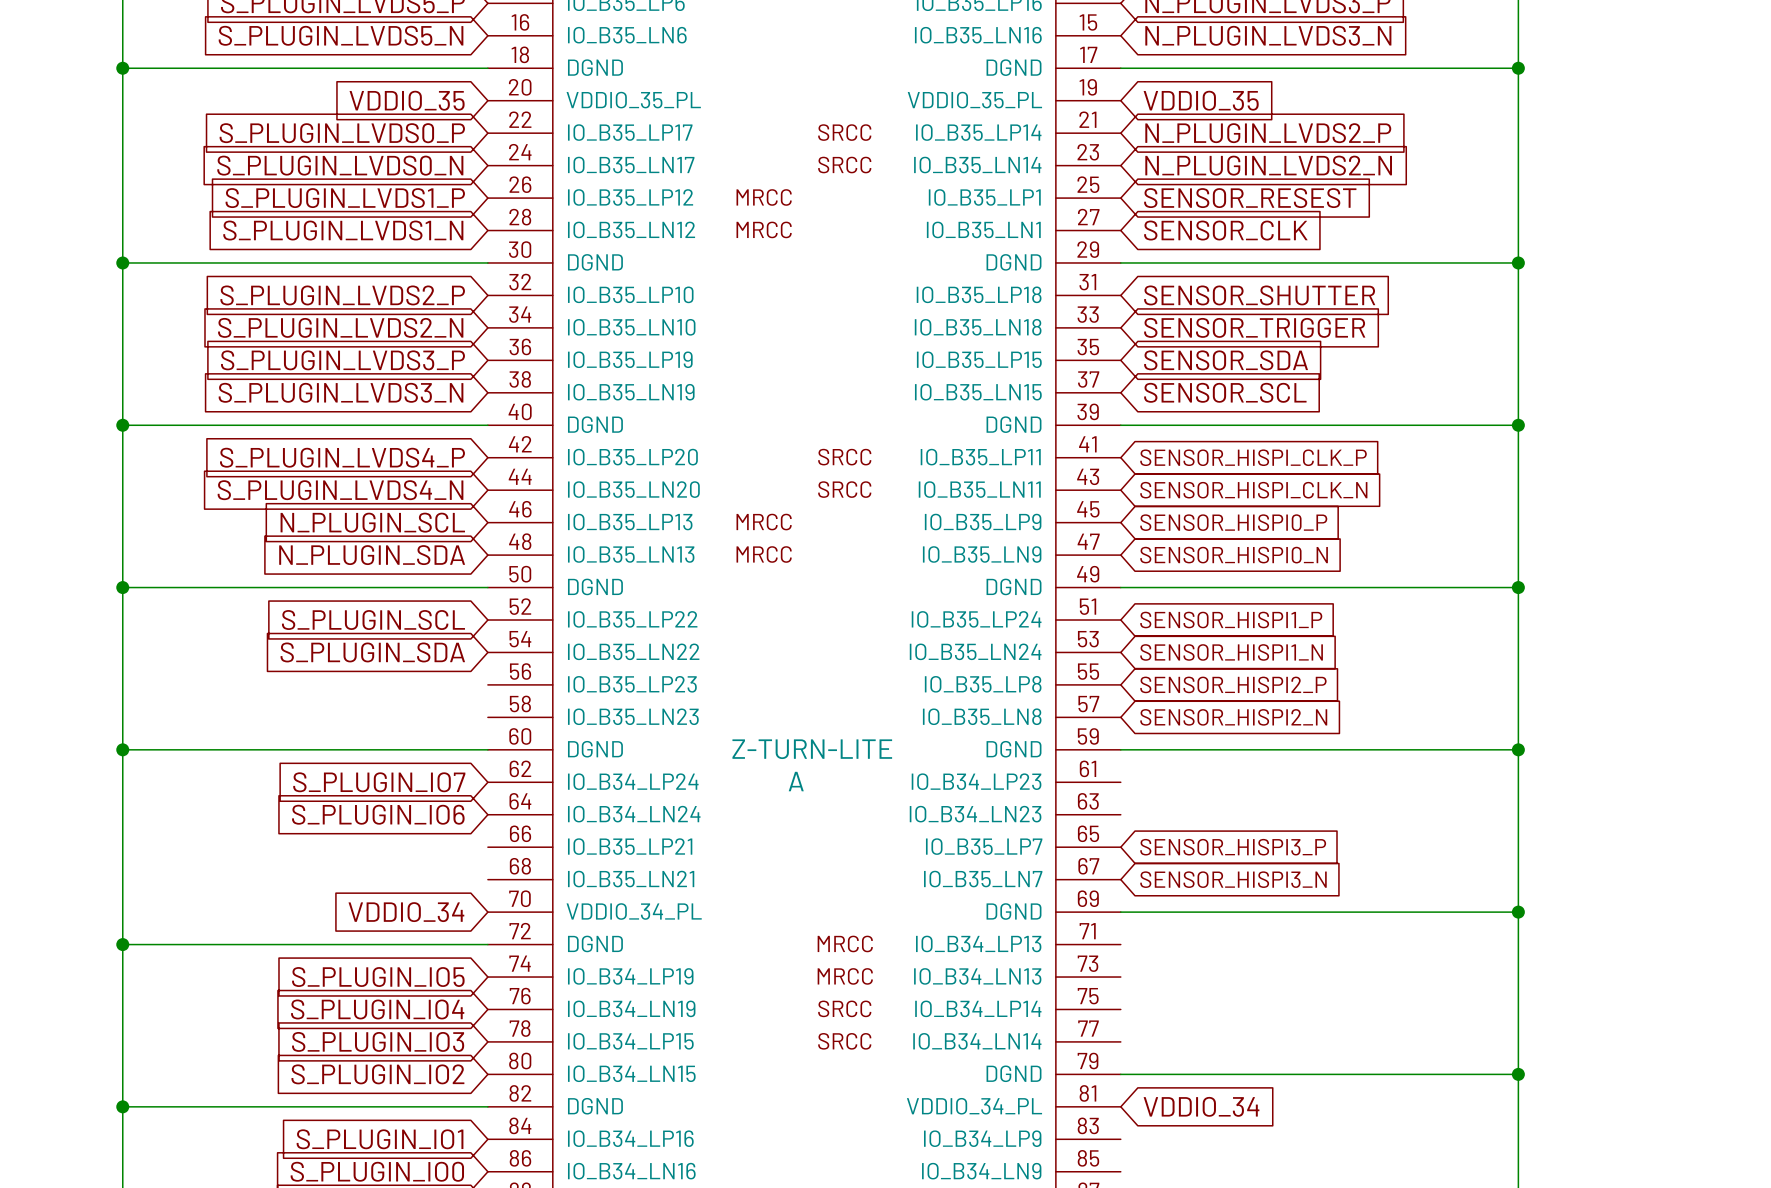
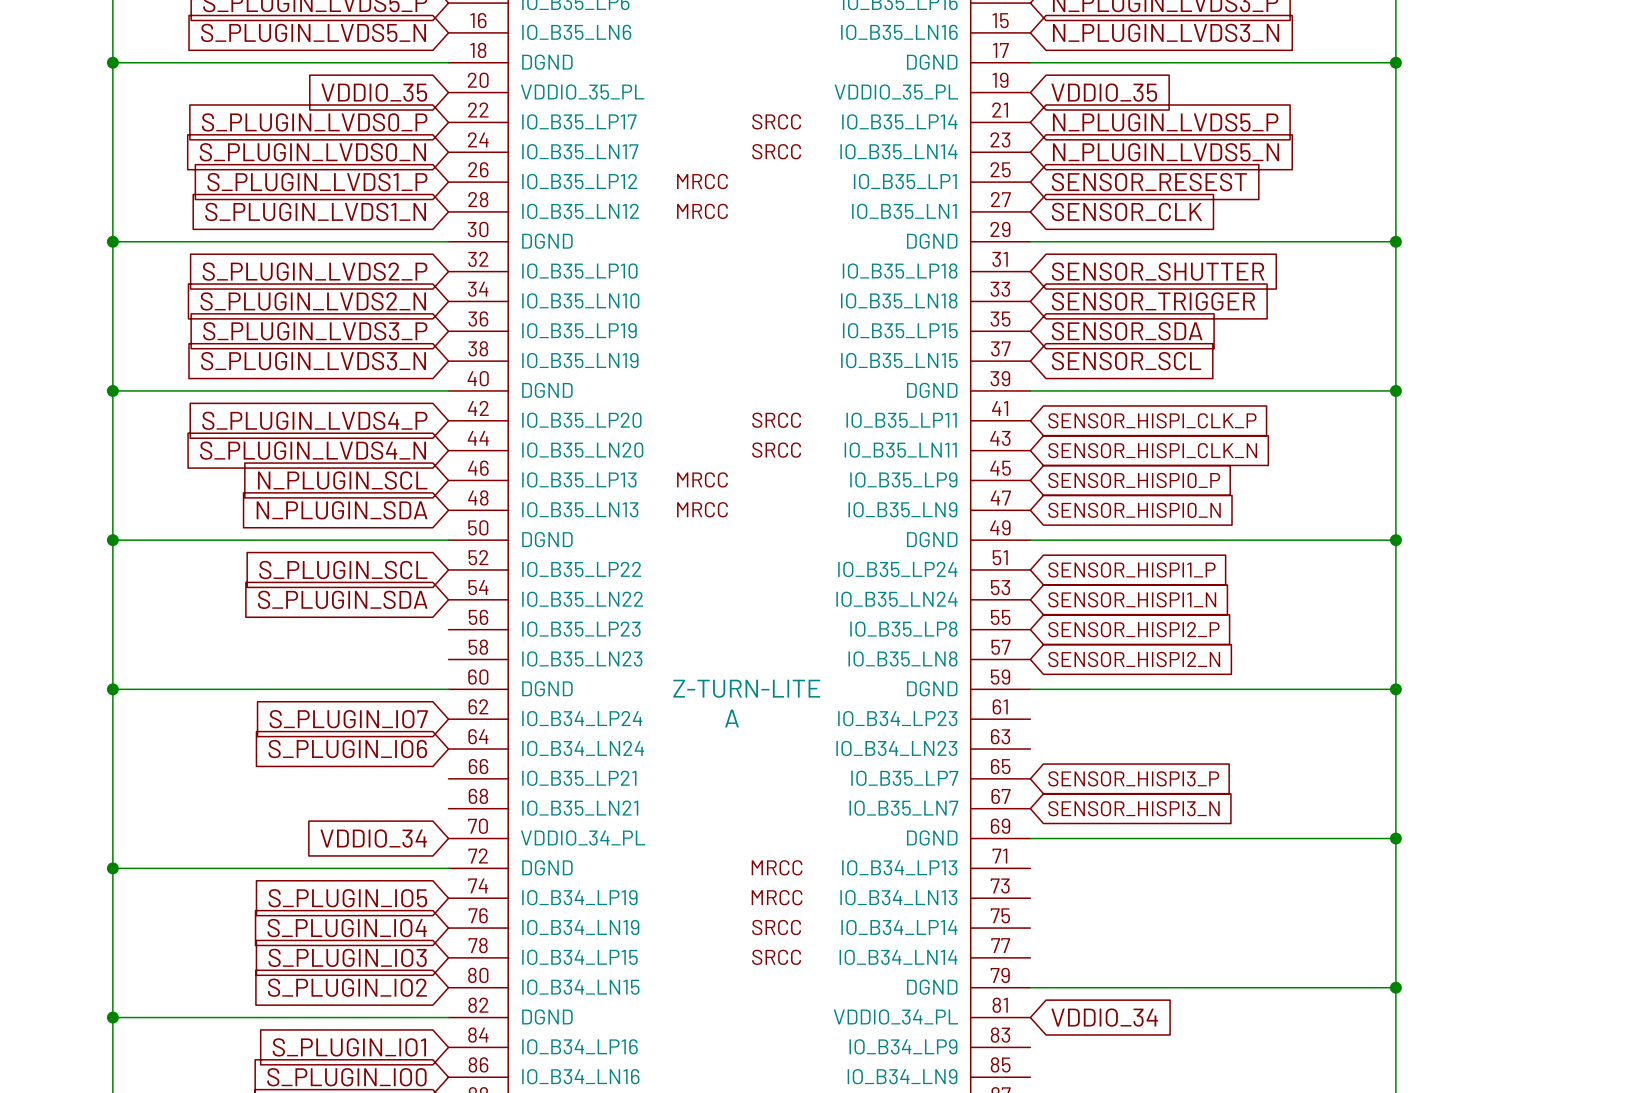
global label: N_PLUGIN_LVDS2_P (1268, 133) -> N_PLUGIN_LVDS5_P (1165, 122)
global label: N_PLUGIN_LVDS2_N (1268, 165) -> N_PLUGIN_LVDS5_N (1166, 152)

